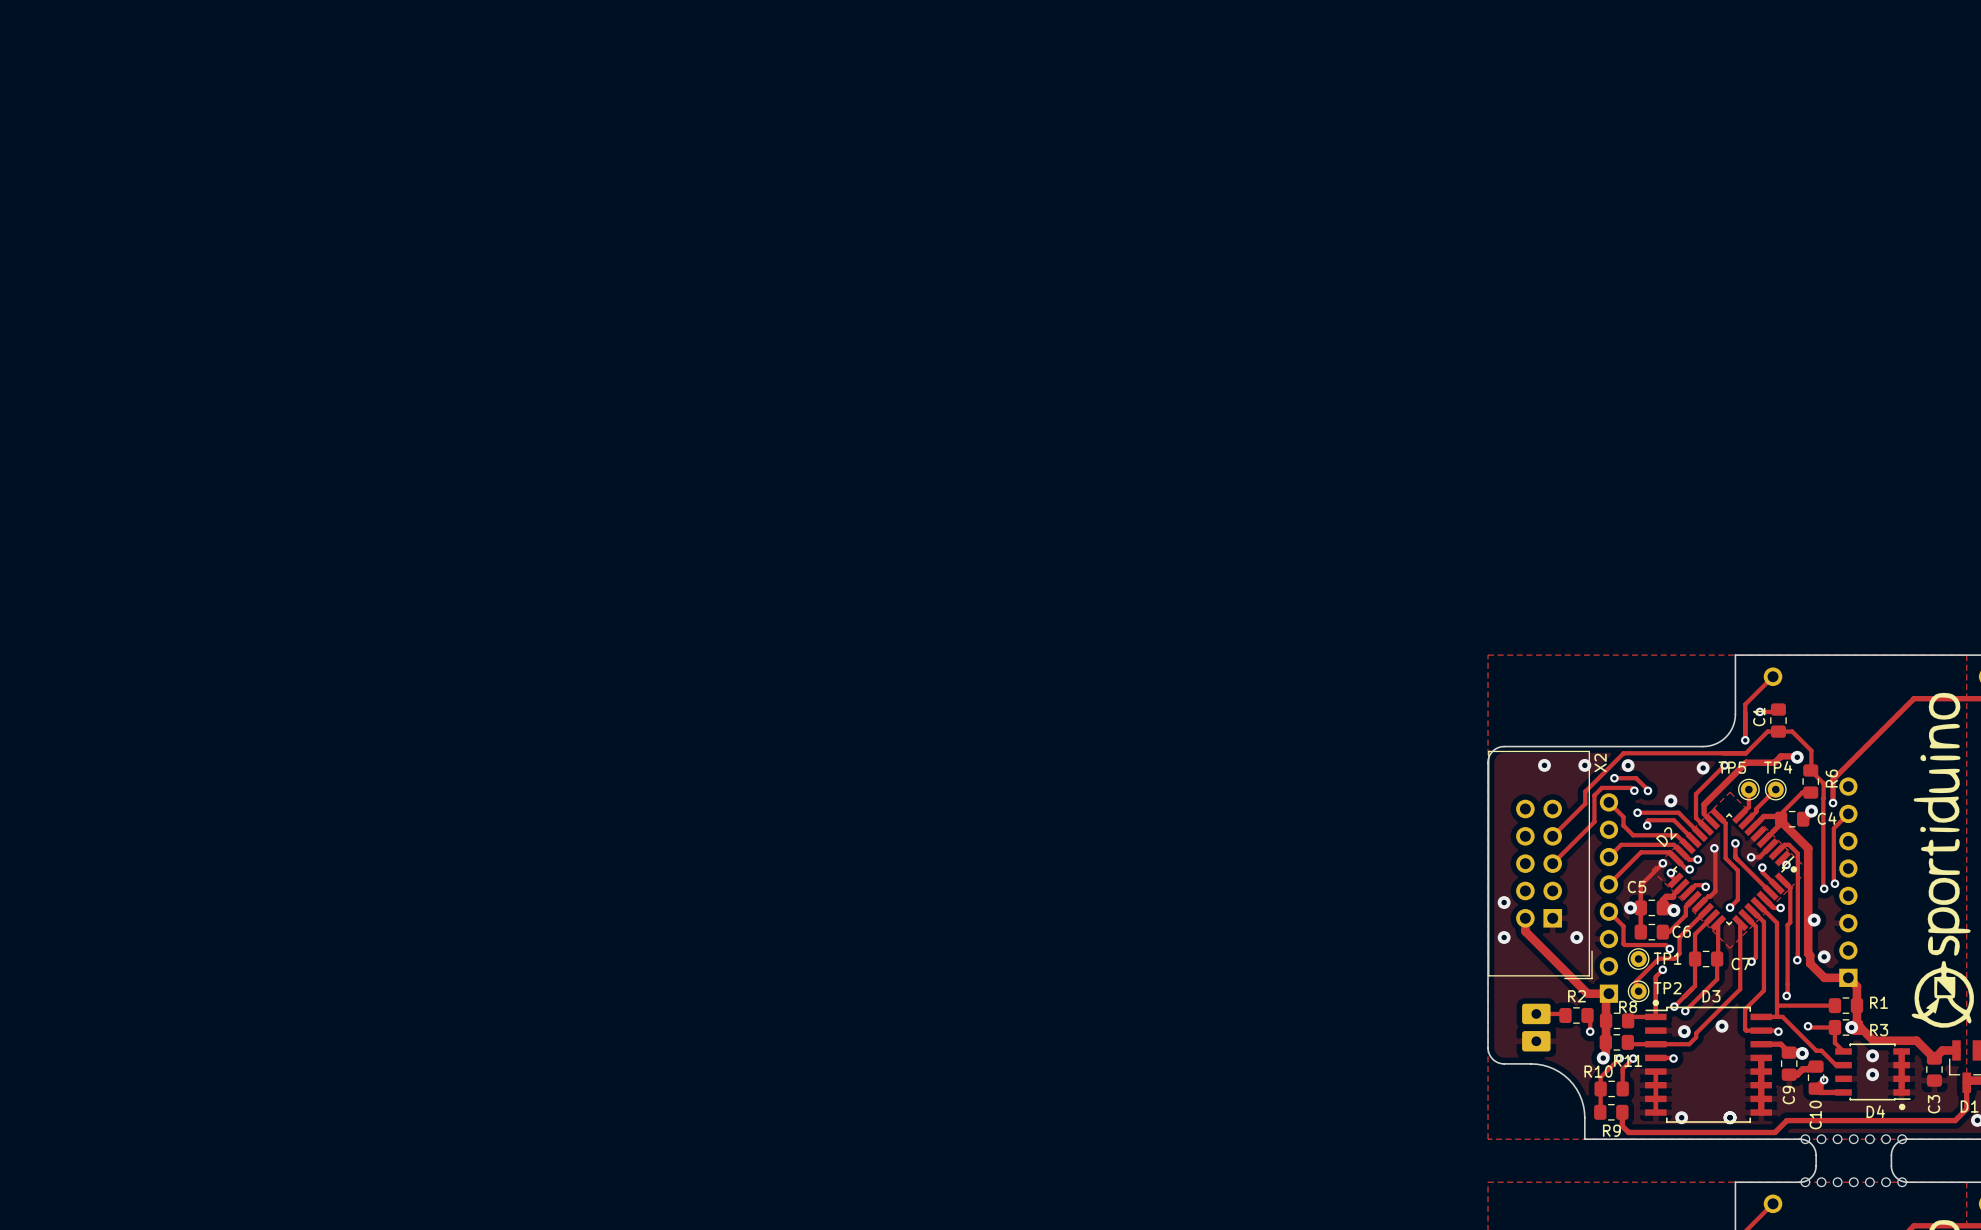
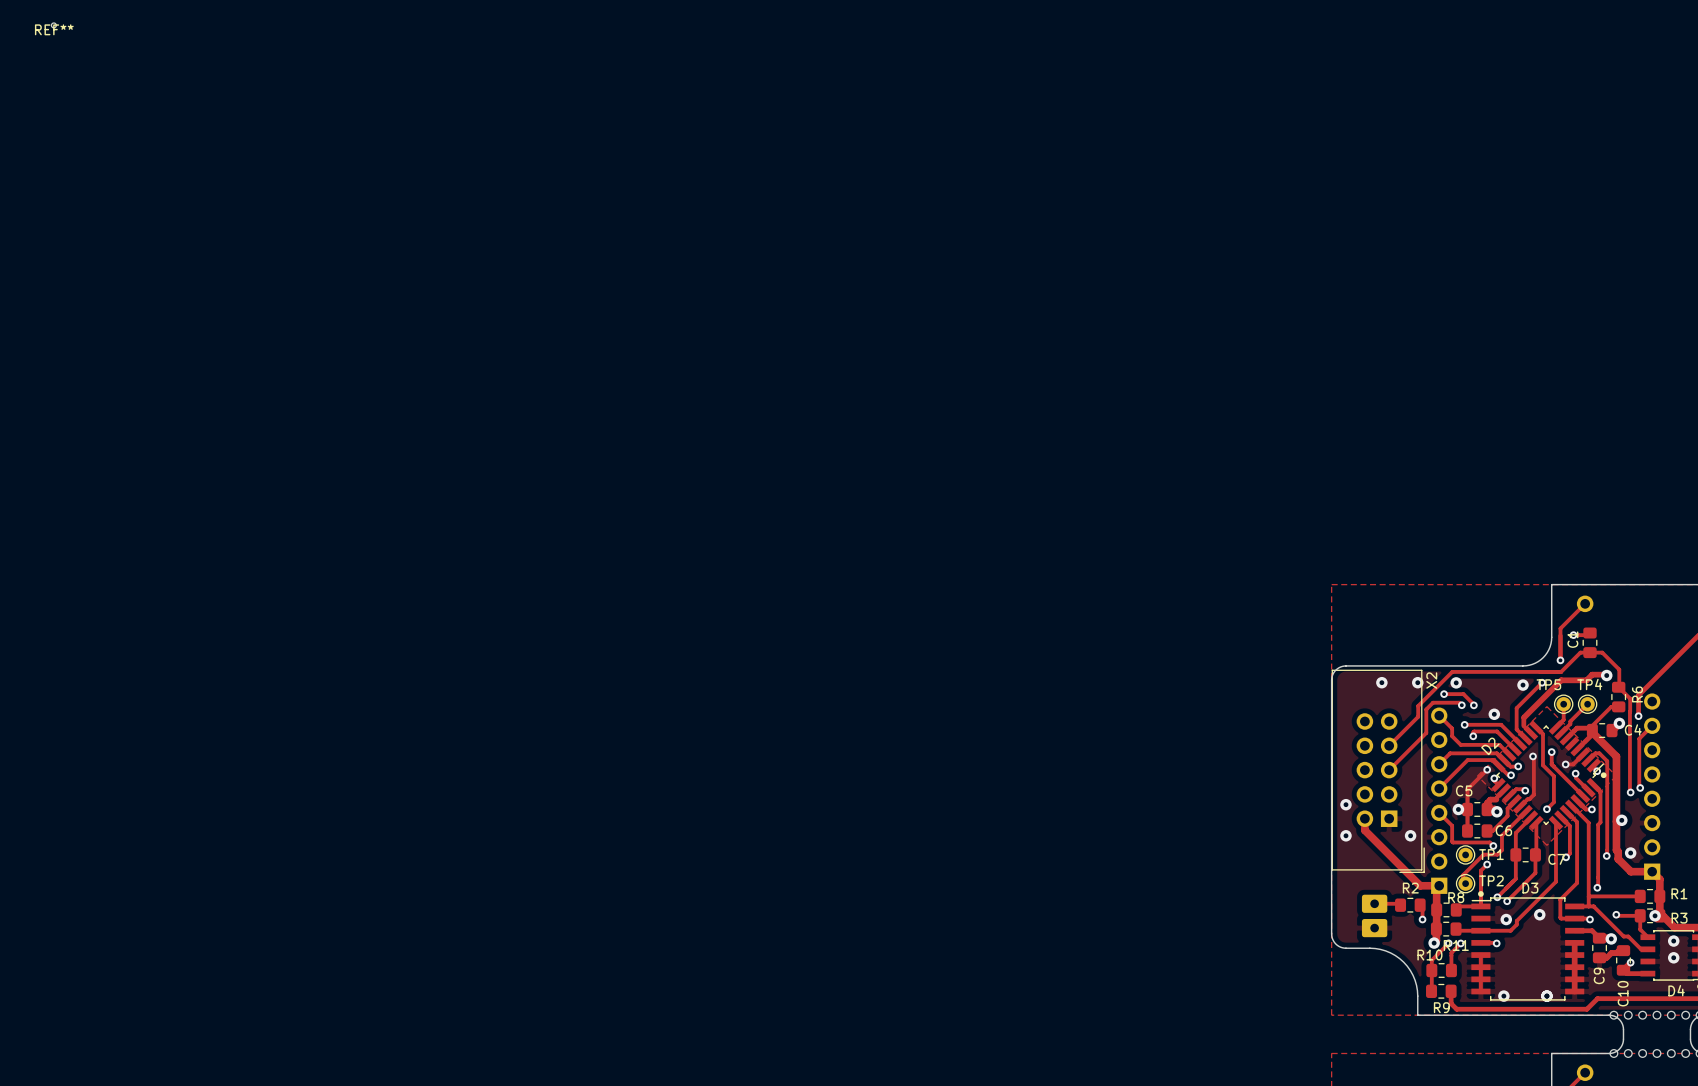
REF**: none -> (53, 25)

